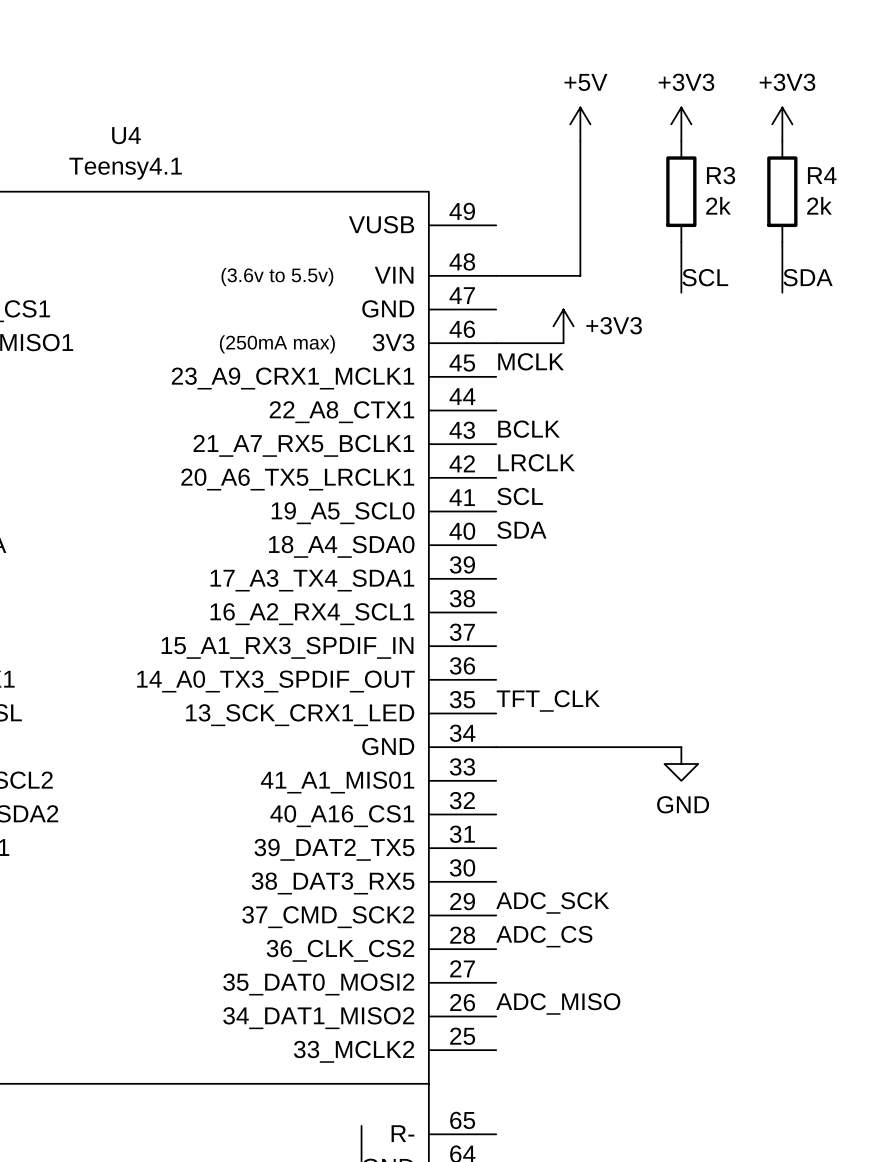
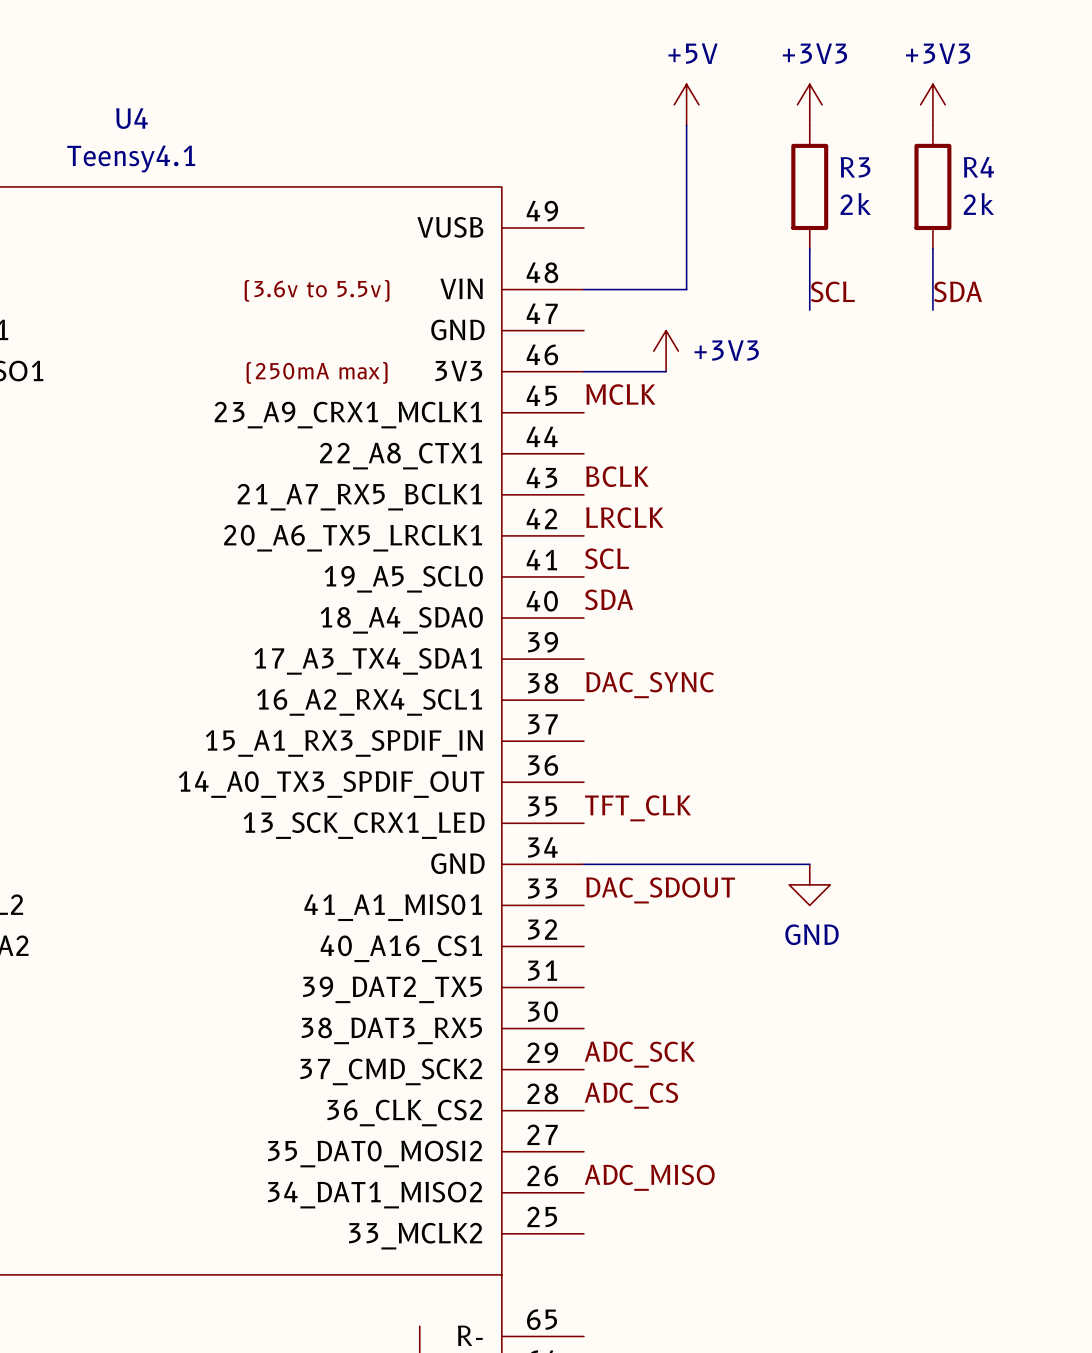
label: none -> DAC_SYNC (650, 685)
label: none -> DAC_SDOUT (660, 890)

